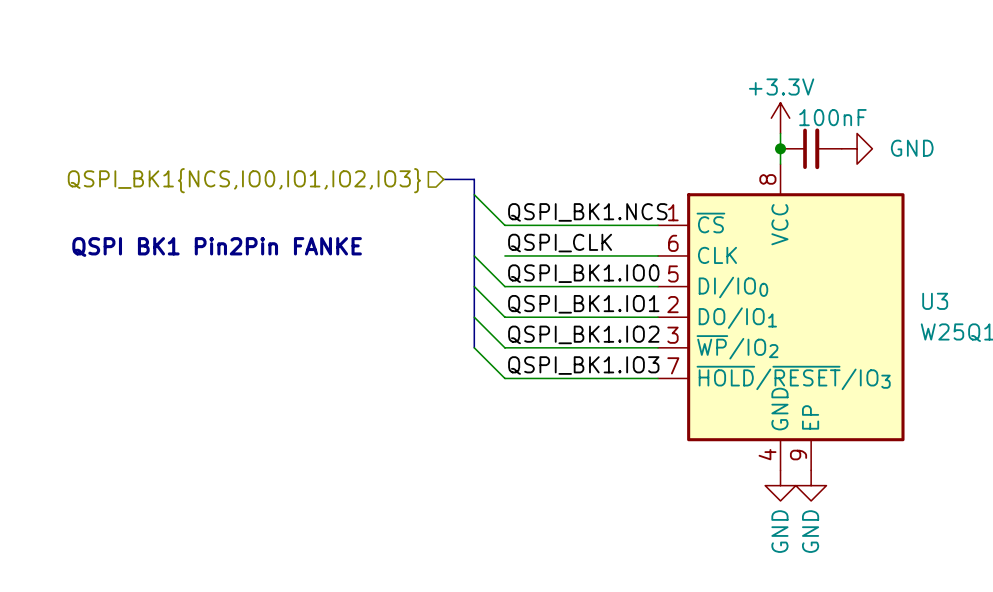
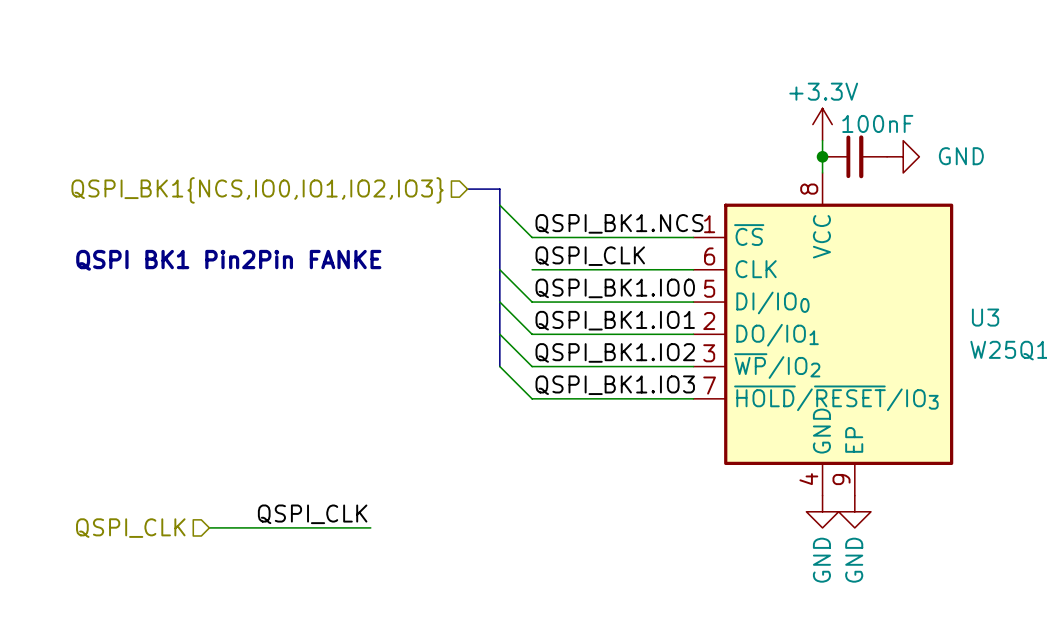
label: none -> QSPI_CLK (312, 514)
wire: none -> (209, 527) (370, 527)
hierarchical label: none -> QSPI_CLK (130, 528)

